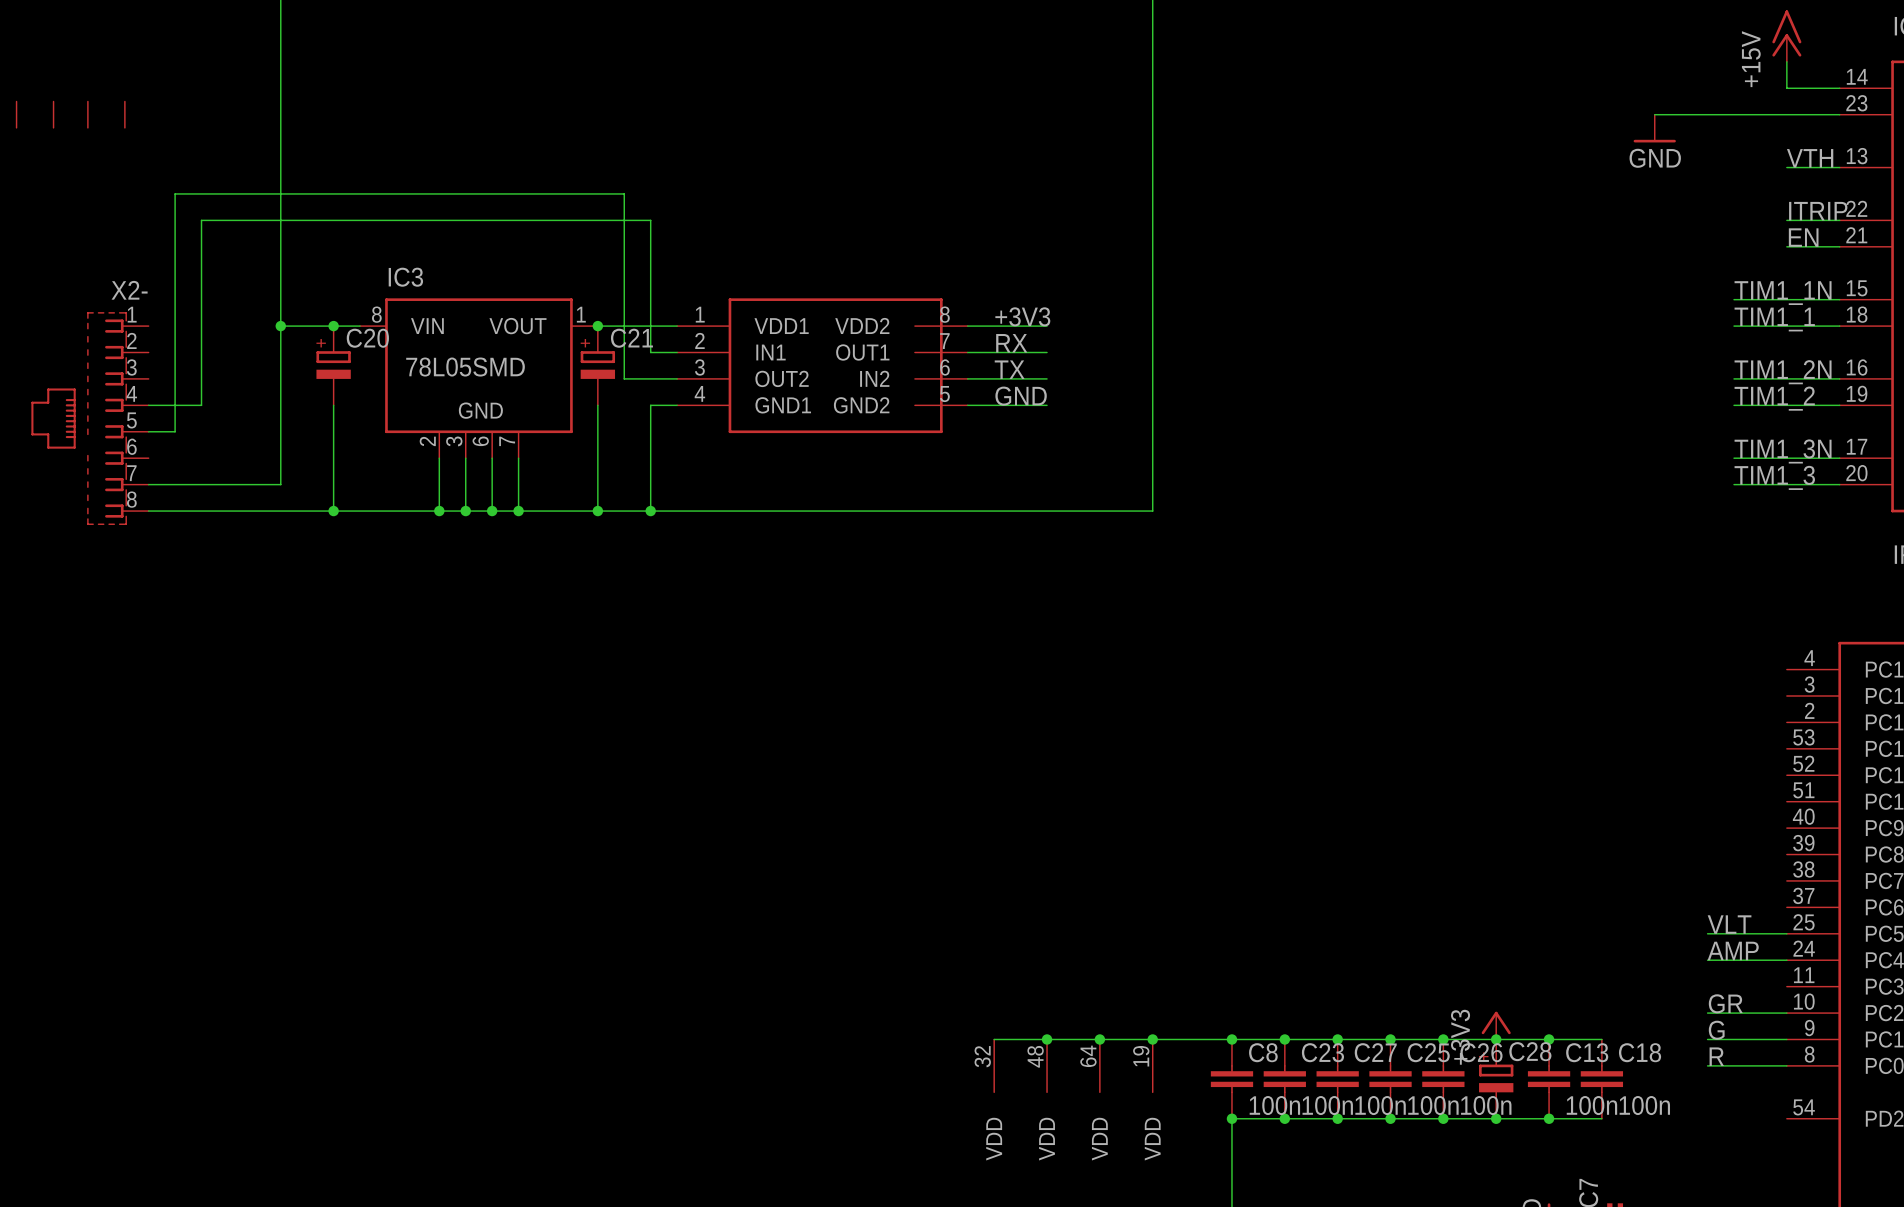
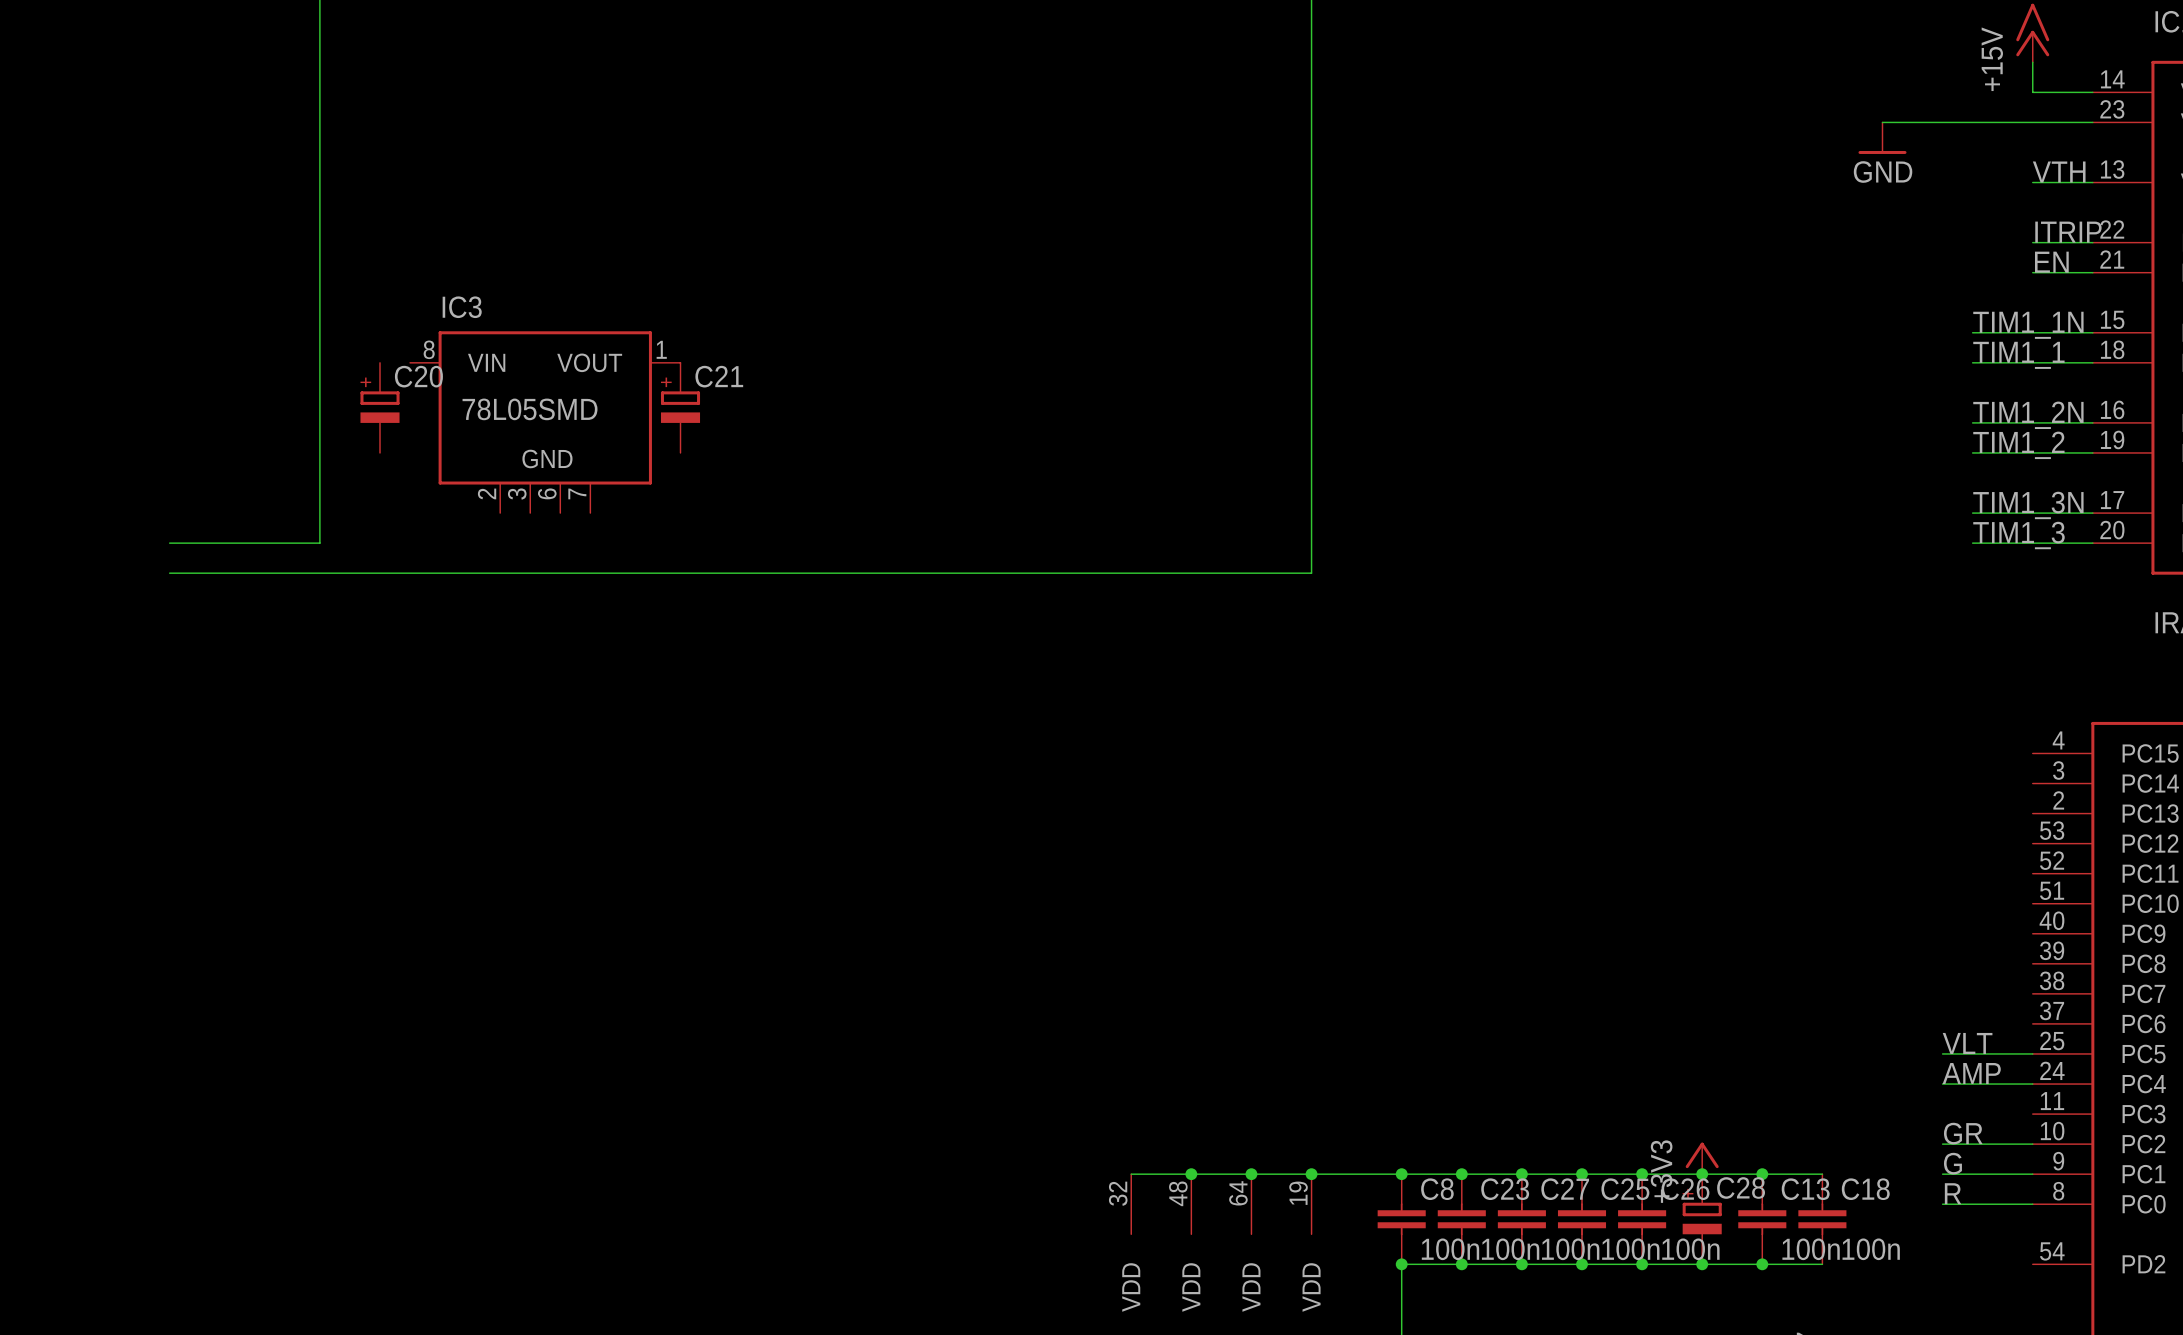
part: (16, 114) -> none
part: (53, 114) -> none
part: (87, 114) -> none
part: (124, 114) -> none
label: +3V3 (1022, 316) -> none
wire: (280, 326) (360, 326) -> none
junction: (280, 326) -> none
junction: (333, 326) -> none
wire: (597, 326) (677, 326) -> none
junction: (597, 326) -> none
wire: (967, 326) (1047, 326) -> none
label: RX (1011, 343) -> none
wire: (677, 352) (650, 352) (650, 220) (201, 220) (201, 405) (148, 405) -> none
wire: (967, 352) (1047, 352) -> none
part: (822, 365) -> none
label: TX (1009, 369) -> none
wire: (677, 378) (624, 378) (624, 193) (175, 193) (175, 431) (148, 431) -> none
wire: (967, 378) (1047, 378) -> none
label: GND (1021, 396) -> none
wire: (333, 405) (333, 511) -> none
wire: (597, 405) (597, 511) -> none
wire: (677, 405) (650, 405) (650, 511) -> none
wire: (967, 405) (1047, 405) -> none
X2-: (90, 418) -> none
wire: (439, 458) (439, 511) -> none
wire: (465, 458) (465, 511) -> none
wire: (492, 458) (492, 511) -> none
wire: (518, 458) (518, 511) -> none
junction: (333, 511) -> none
junction: (439, 511) -> none
junction: (465, 511) -> none
junction: (492, 511) -> none
junction: (518, 511) -> none
junction: (597, 511) -> none
junction: (650, 511) -> none

